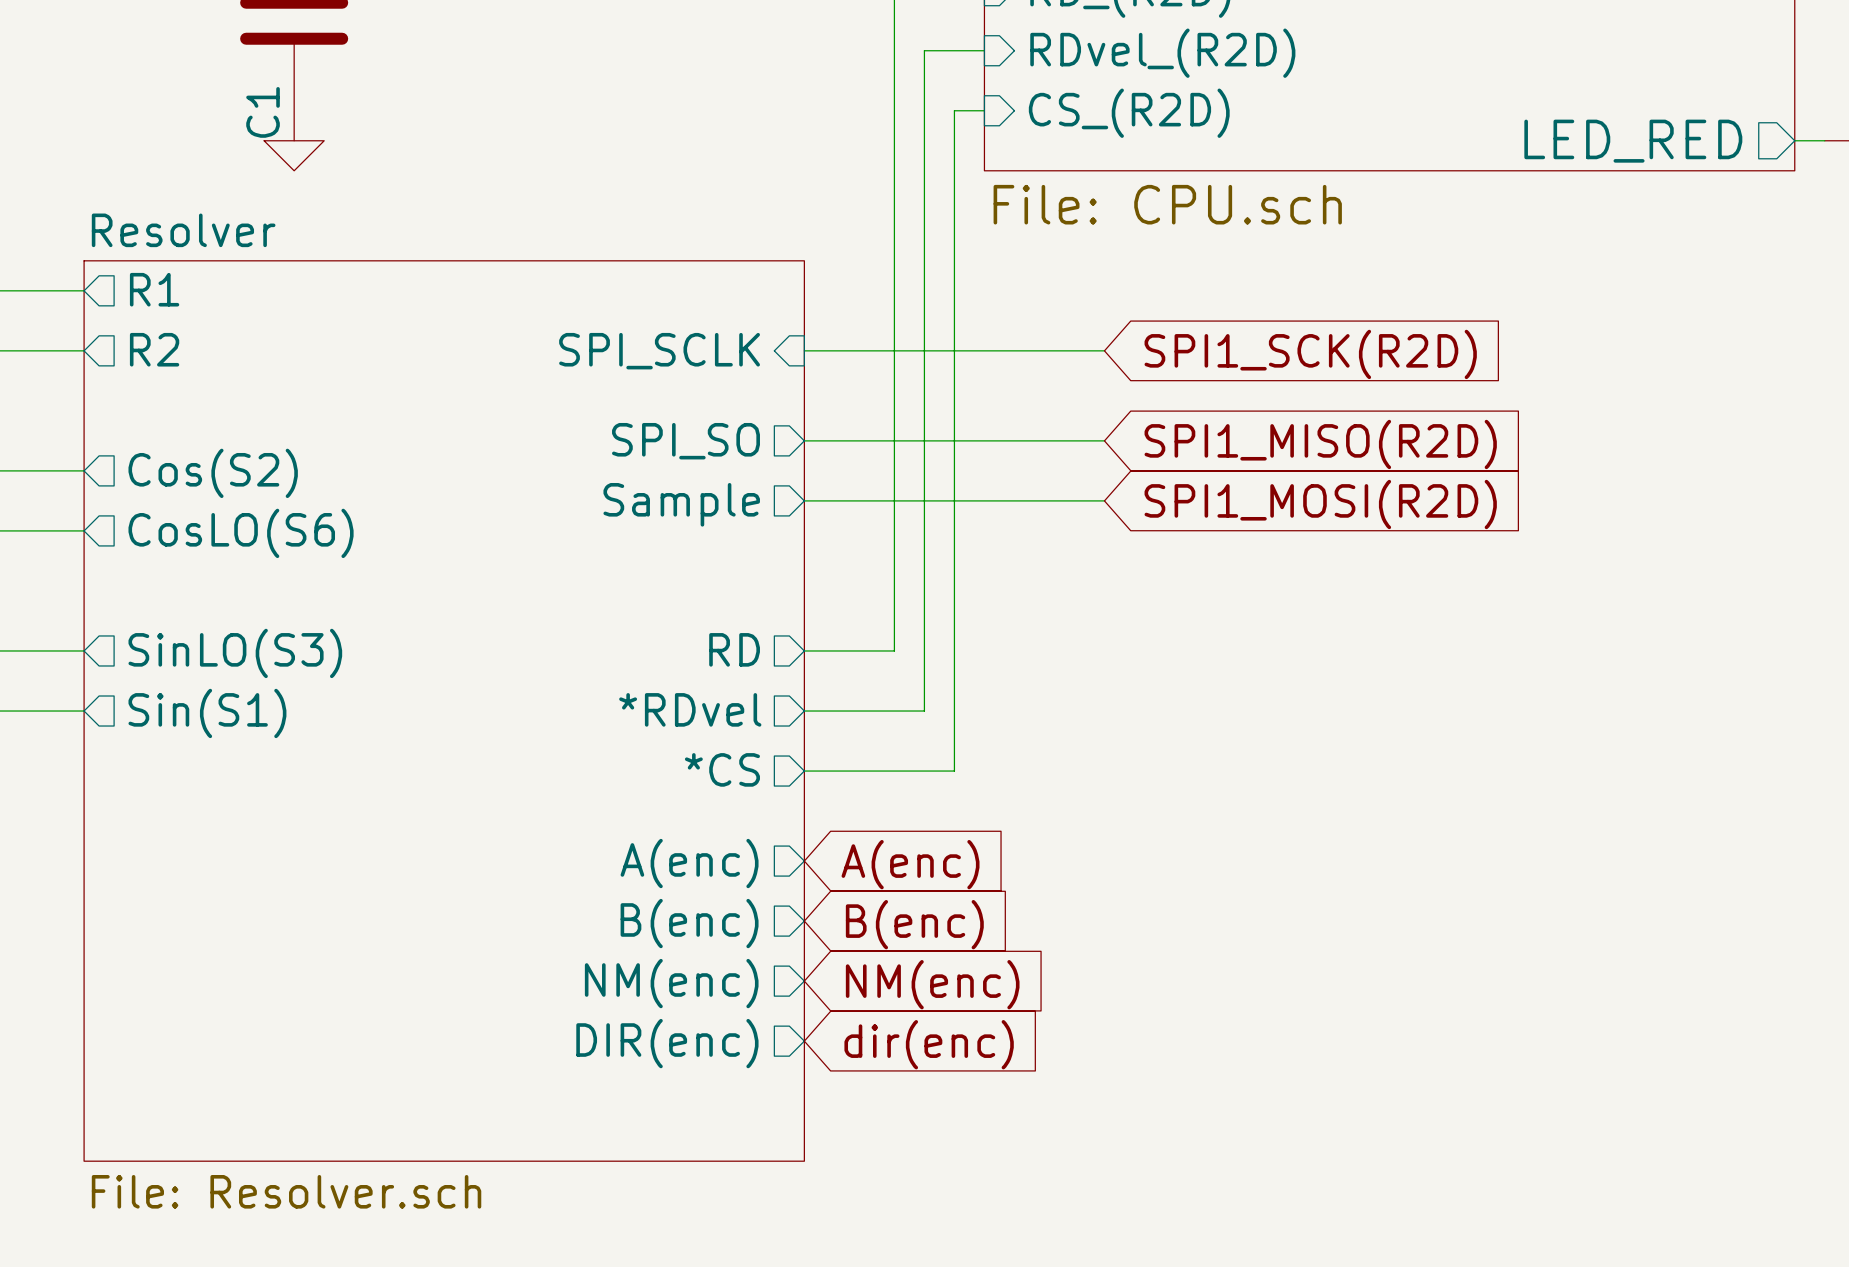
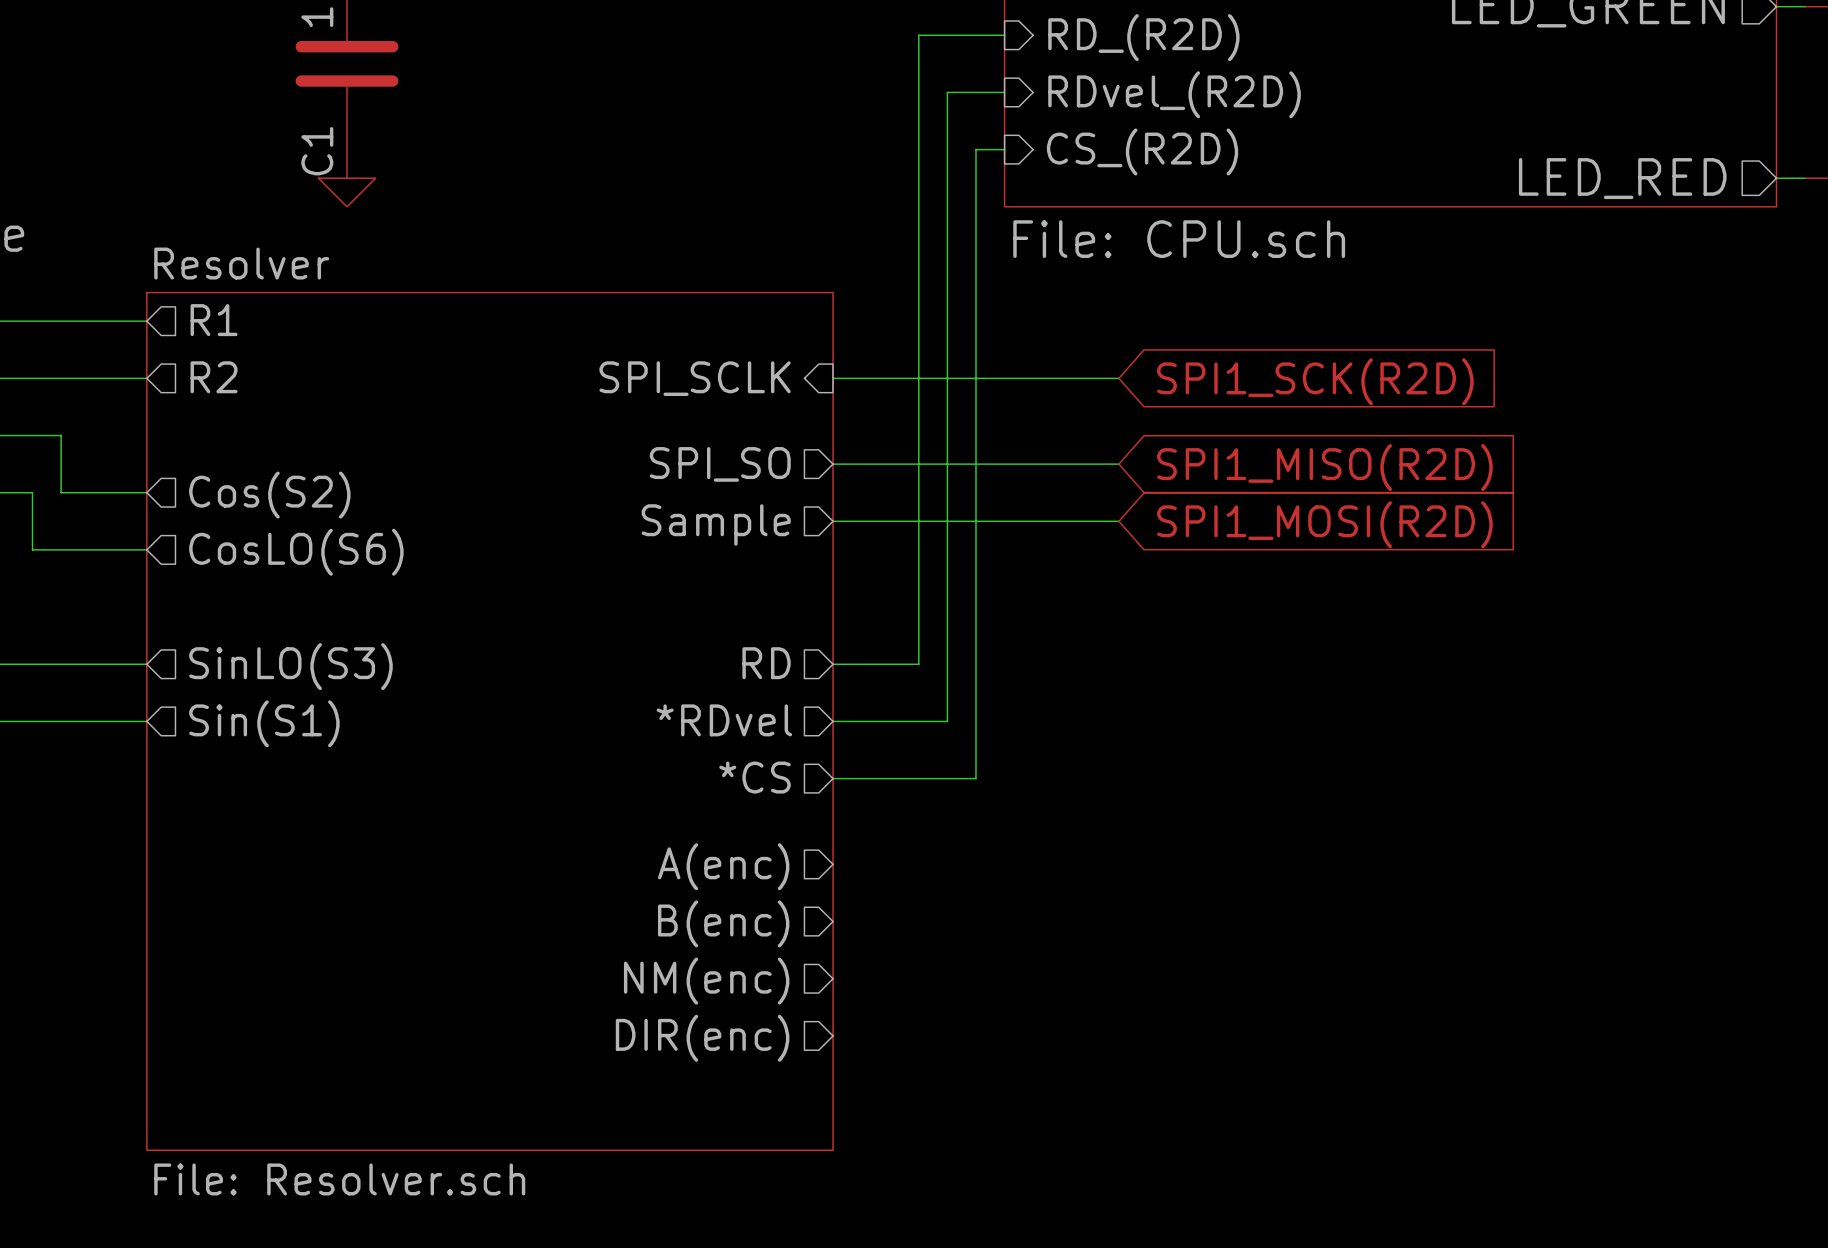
global label: A(enc) (910, 864) -> none
global label: B(enc) (914, 924) -> none
global label: NM(enc) (932, 984) -> none
global label: dir(enc) (929, 1044) -> none

